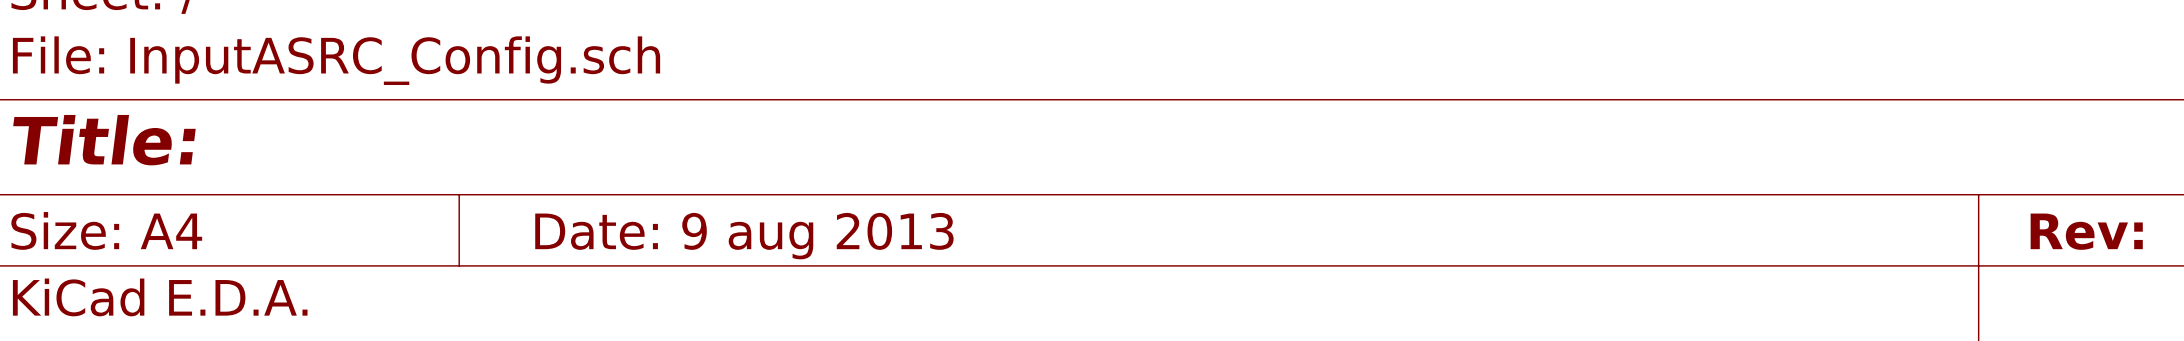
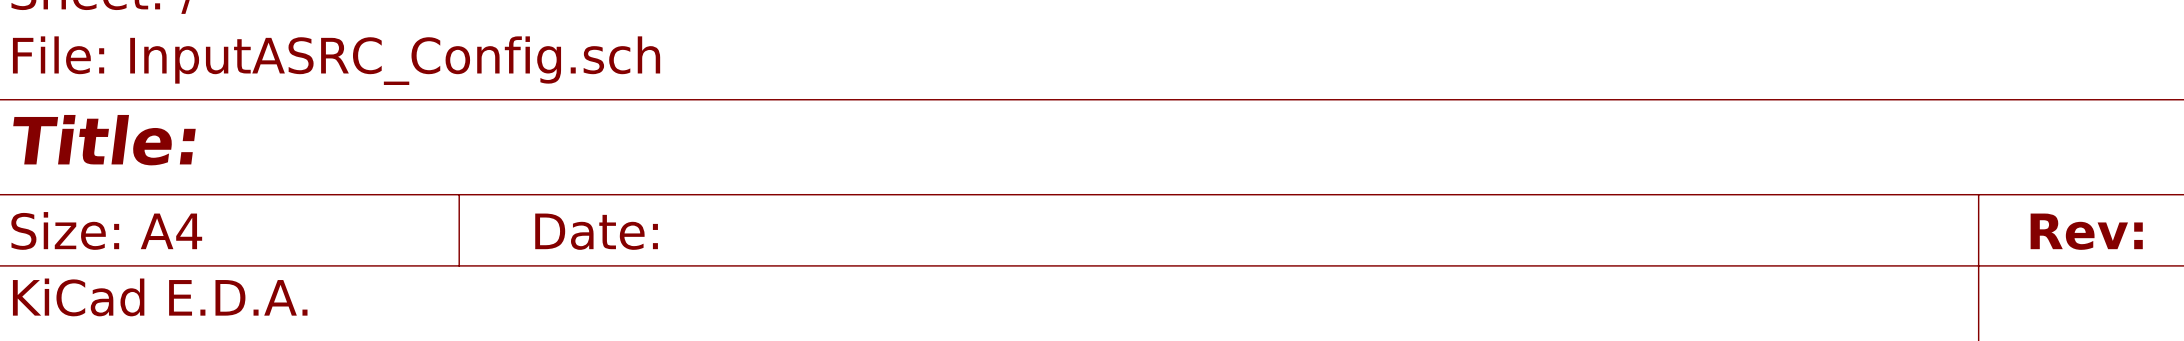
title block: Date: 9 aug 2013 (744, 236) -> Date: (596, 231)

